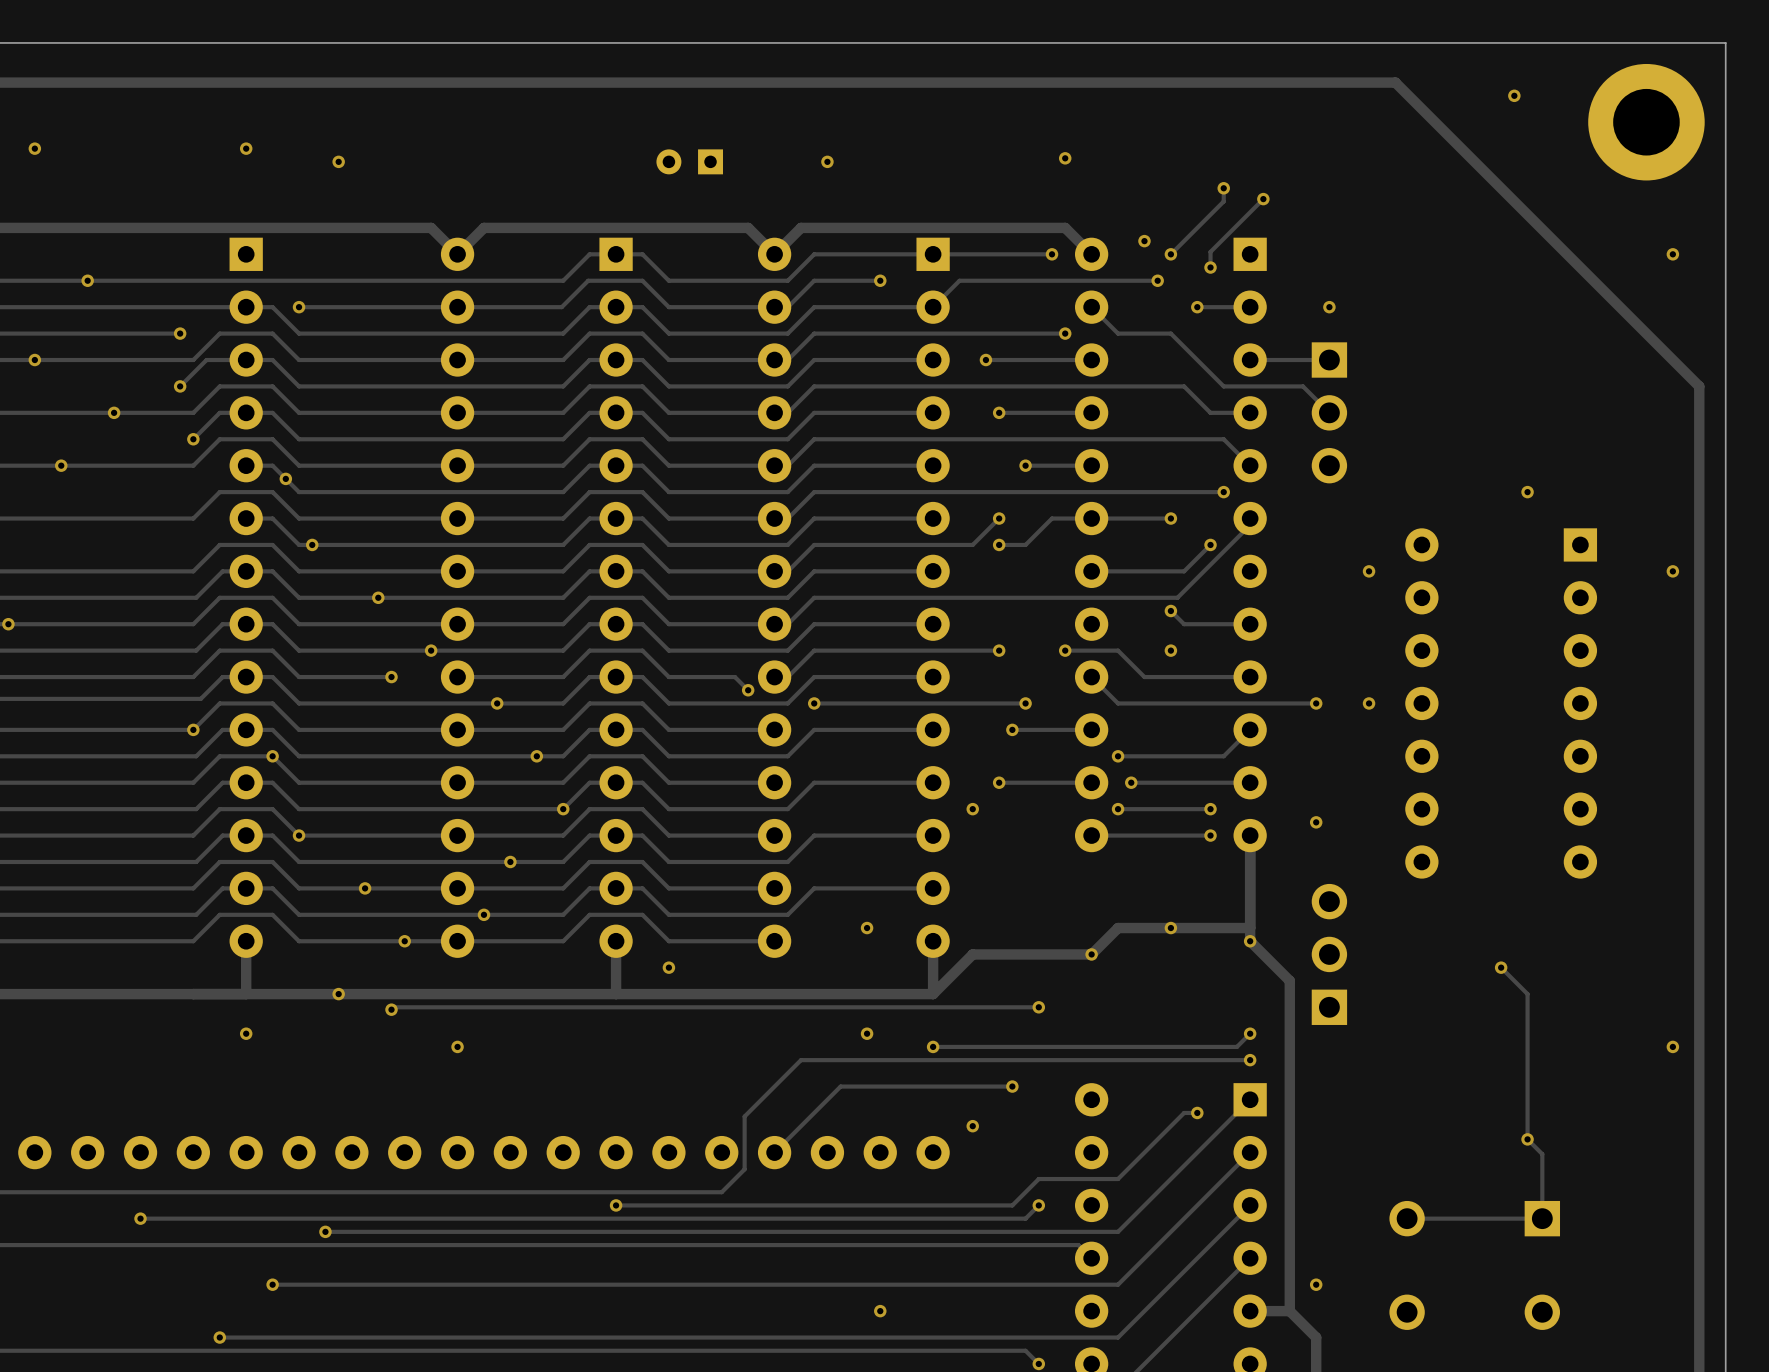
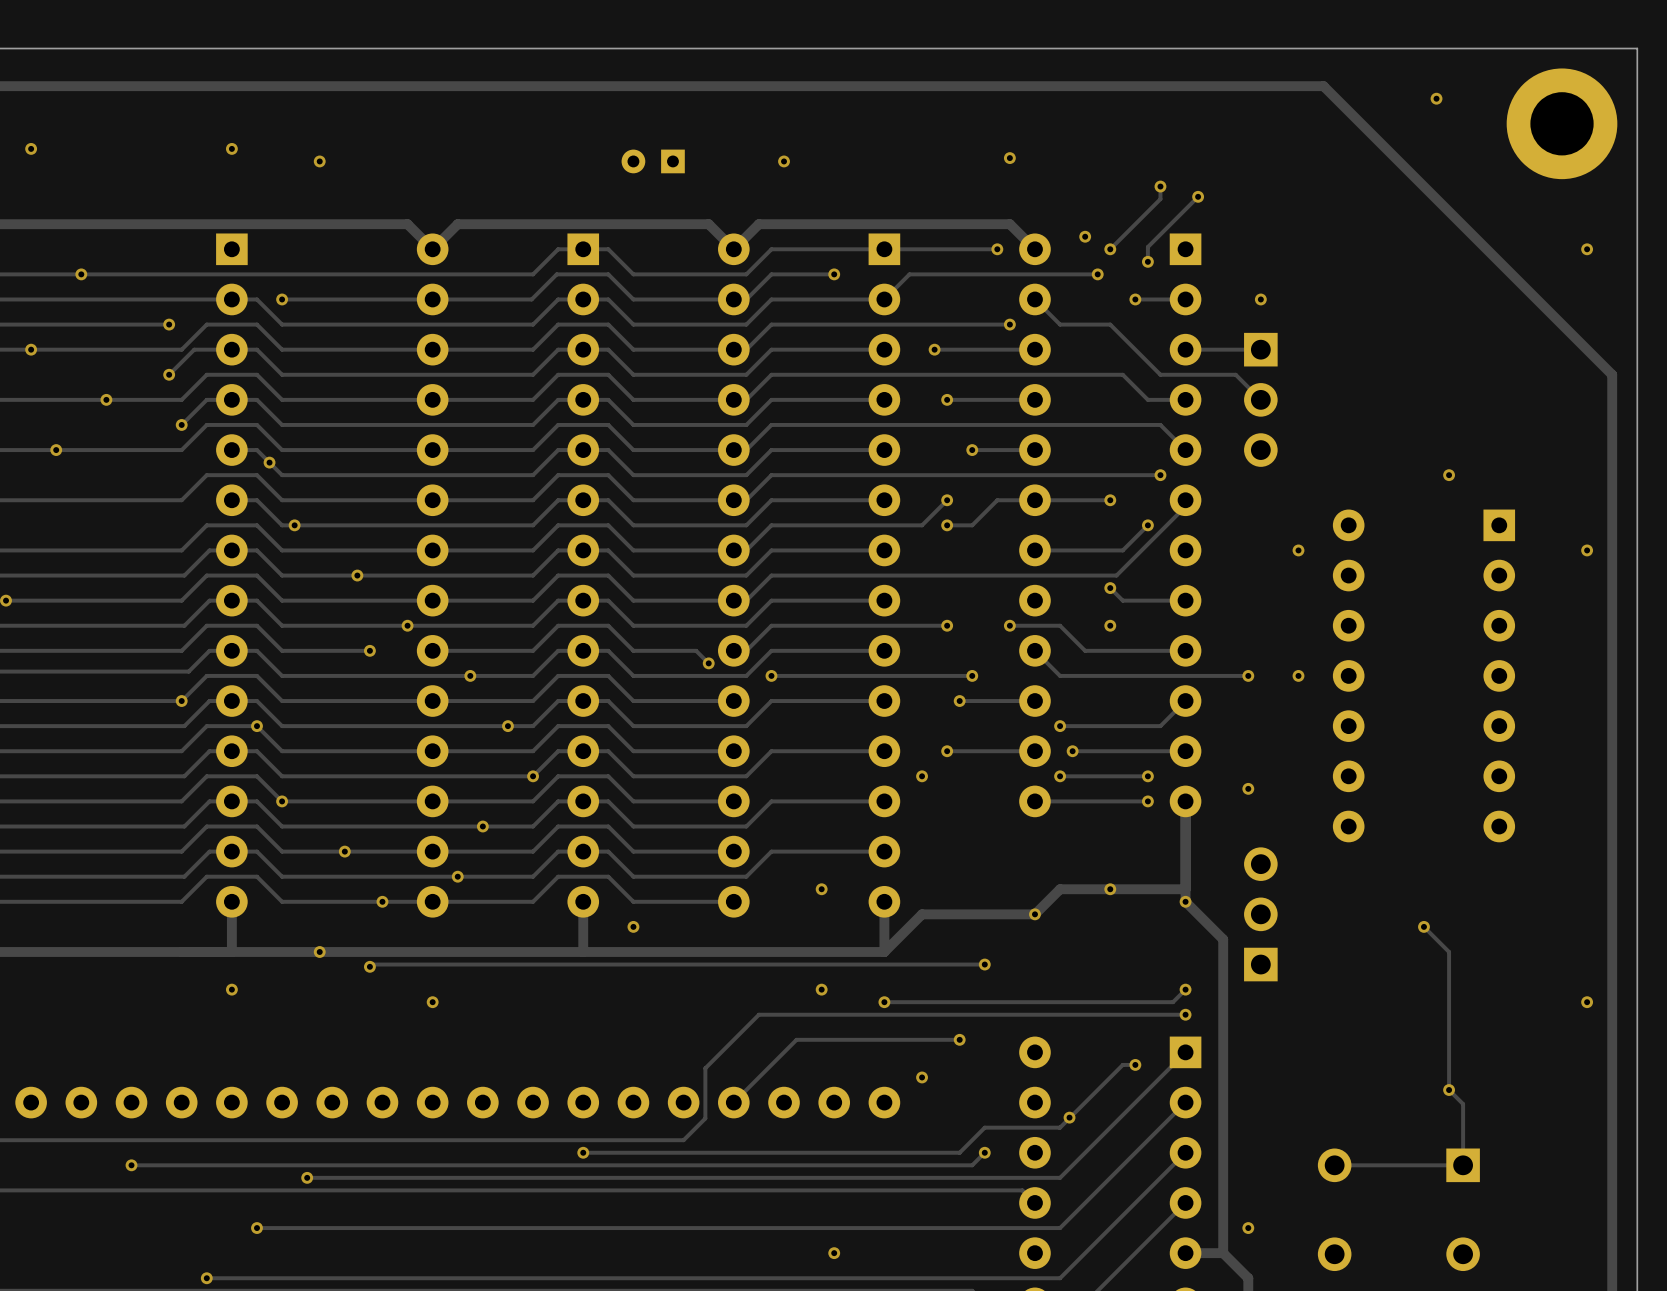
via: none -> (1069, 1117)

